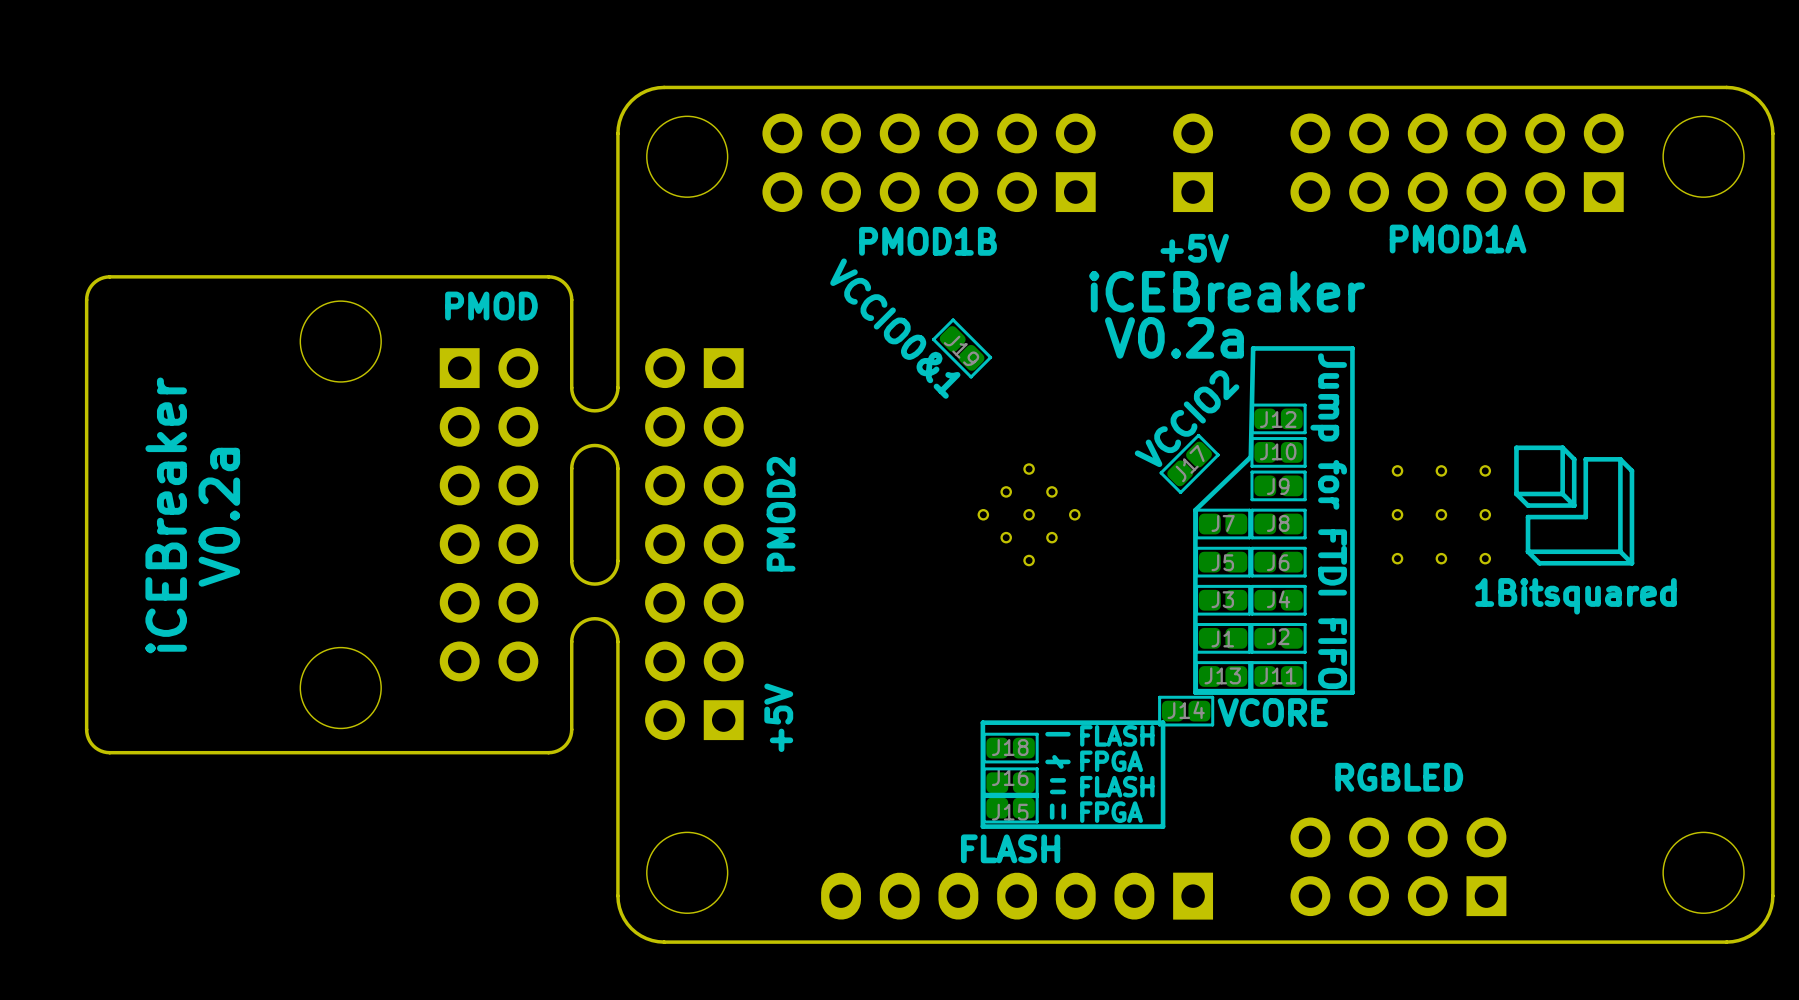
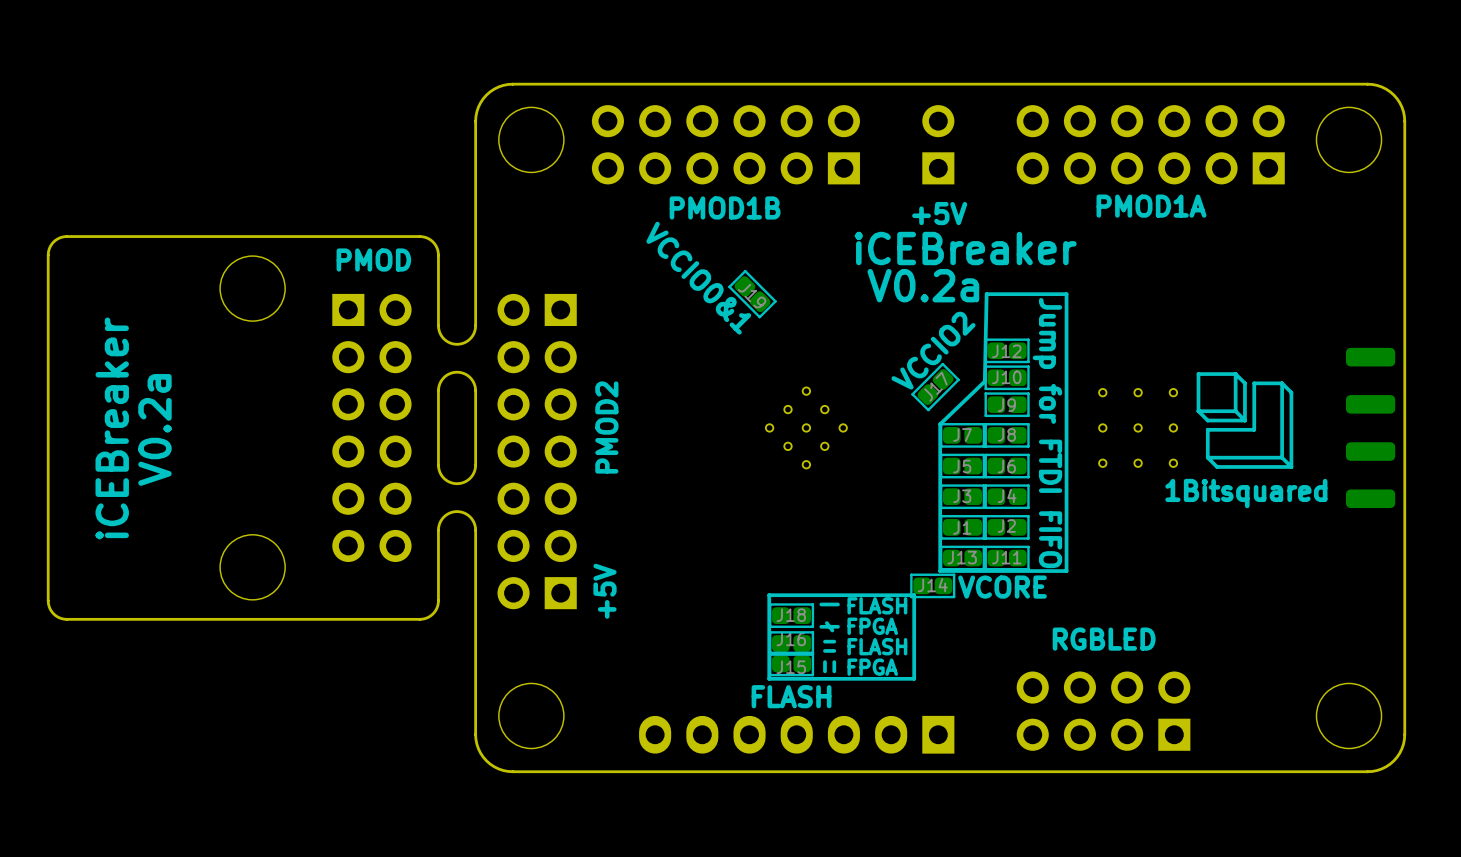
part: none -> (1370, 357)
part: none -> (1370, 404)
part: none -> (1370, 451)
part: none -> (1370, 498)

